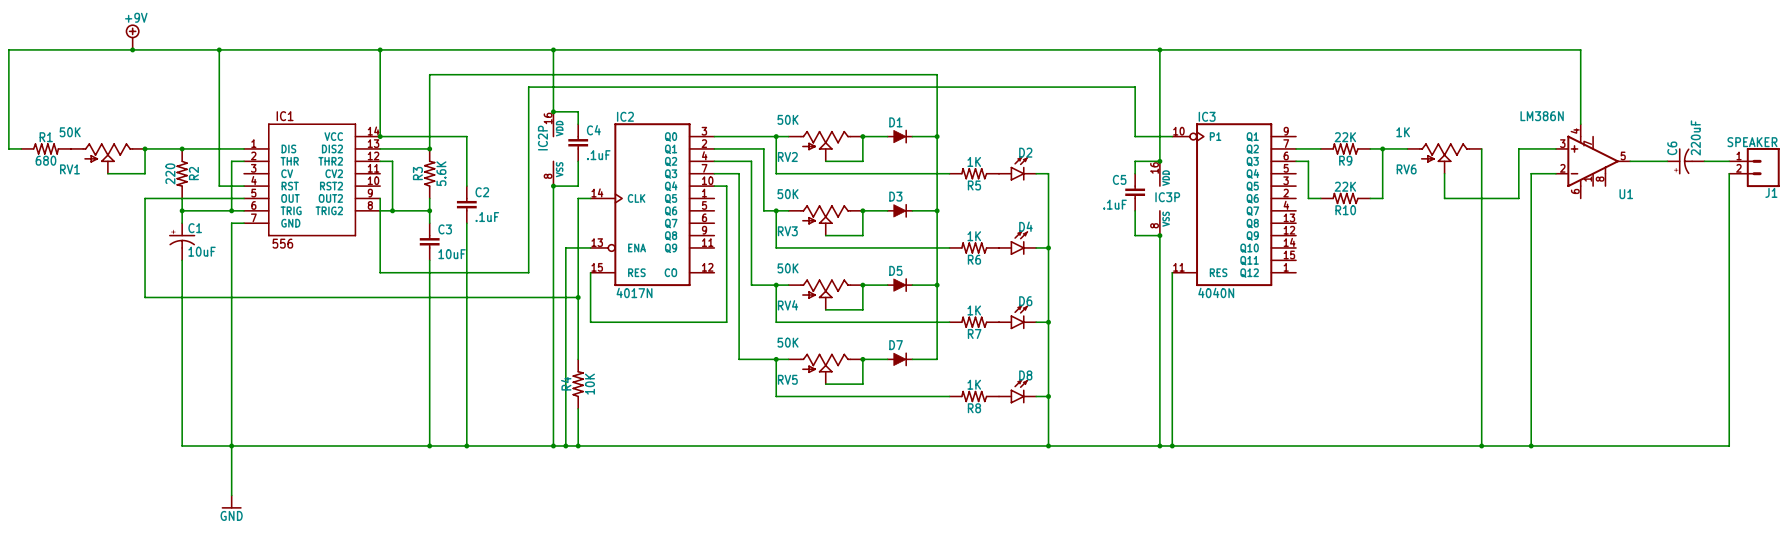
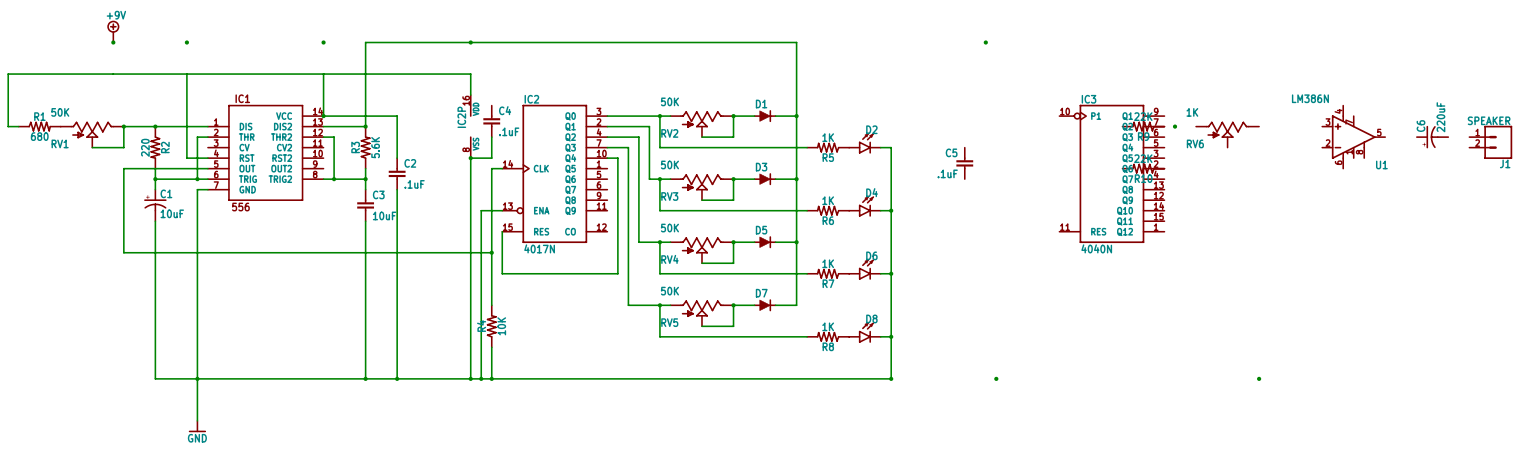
wire: (219, 49) (219, 87) -> none
wire: (380, 49) (380, 87) -> none
wire: (429, 49) (8, 49) (8, 87) -> (449, 74) (8, 74)
wire: (553, 49) (553, 87) (1135, 87) (1135, 136) (1172, 136) -> none
wire: (937, 49) (1580, 49) (1580, 124) -> (796, 42) (796, 63)
wire: (1159, 49) (1159, 161) (1135, 161) (1135, 173) -> none
wire: (429, 74) (937, 74) -> (365, 63) (365, 42)
wire: (528, 87) (528, 272) (380, 272) (380, 198) -> none
wire: (553, 111) (578, 111) (578, 124) -> none
junction: (553, 111) -> none
wire: (1296, 148) (1320, 148) -> none
wire: (1370, 148) (1407, 148) -> none
wire: (1382, 148) (1382, 198) (1370, 198) -> none
wire: (1481, 148) (1481, 446) -> none
wire: (1555, 148) (1518, 148) (1518, 198) (1444, 198) (1444, 173) -> none
junction: (1159, 161) -> none
wire: (1296, 161) (1308, 161) (1308, 198) (1320, 198) -> none
wire: (1630, 161) (1667, 161) -> none
wire: (1704, 161) (1729, 161) -> none
wire: (1555, 173) (1531, 173) (1531, 446) -> none
wire: (1729, 173) (1729, 446) (1048, 446) -> none
IC3P: (1159, 198) -> none
IC3 position: (1234, 204) -> (1111, 173)
wire: (1135, 210) (1135, 235) (1159, 235) (1159, 446) -> none
junction: (1159, 235) -> none
wire: (1172, 272) (1172, 446) -> none
junction: (1159, 446) -> none
junction: (1531, 446) -> none

